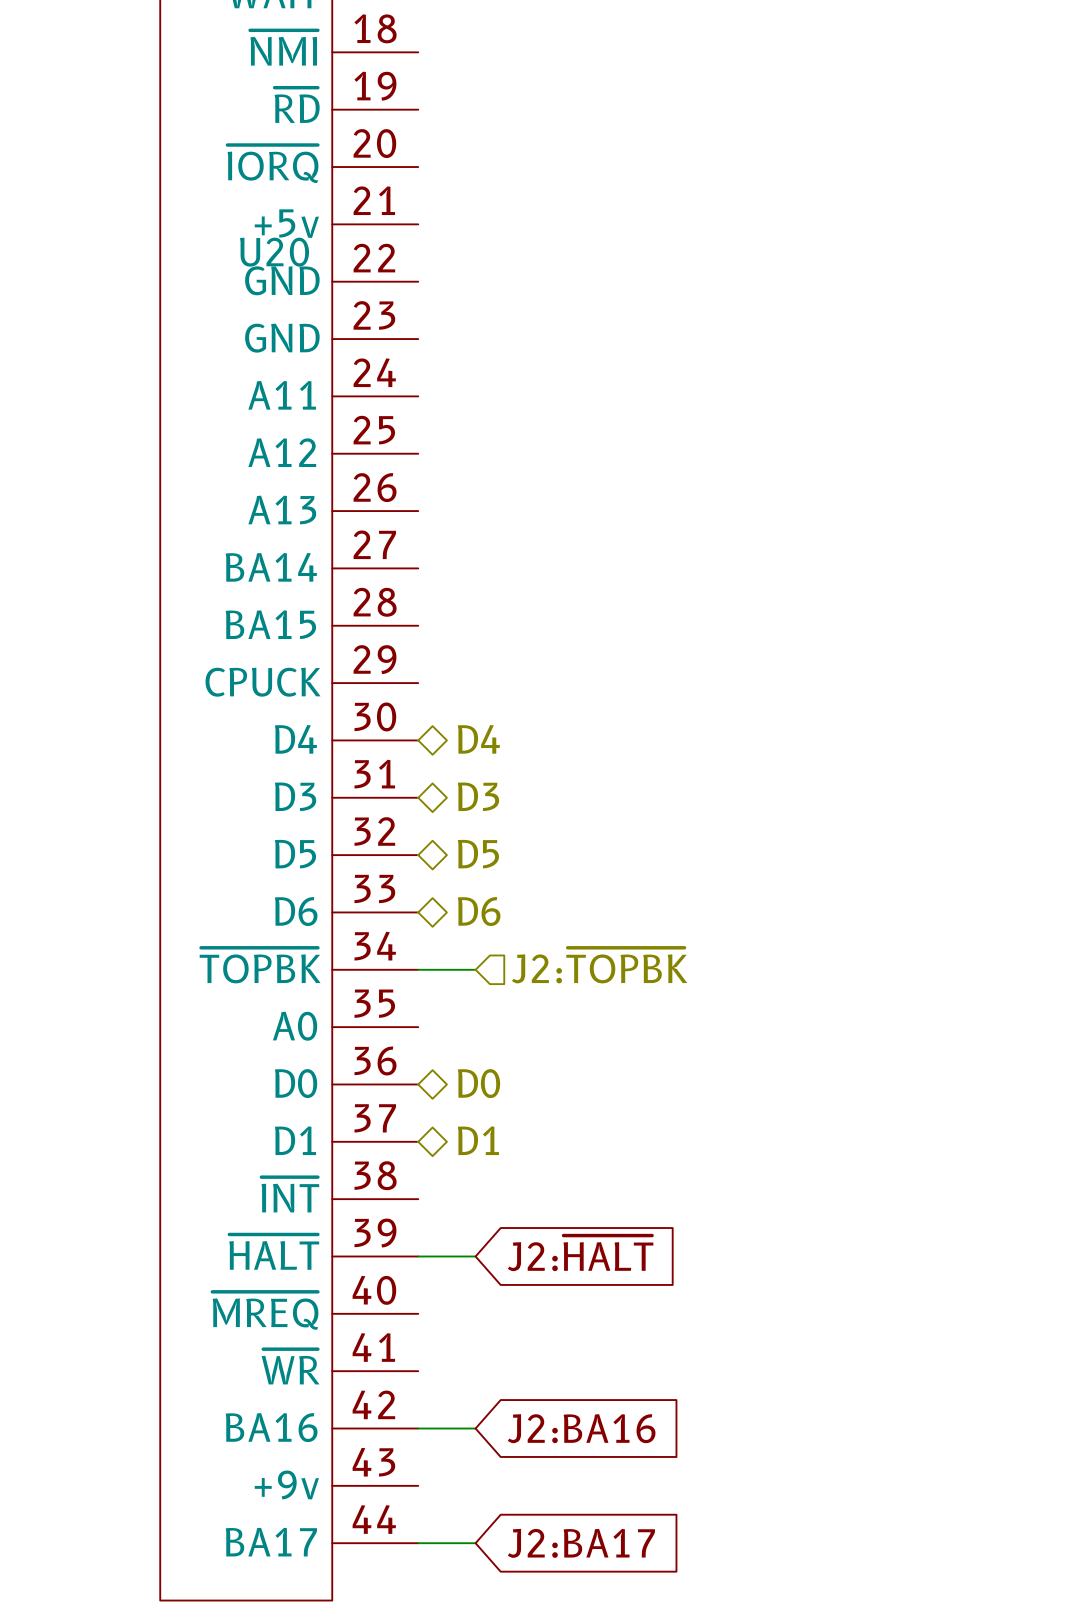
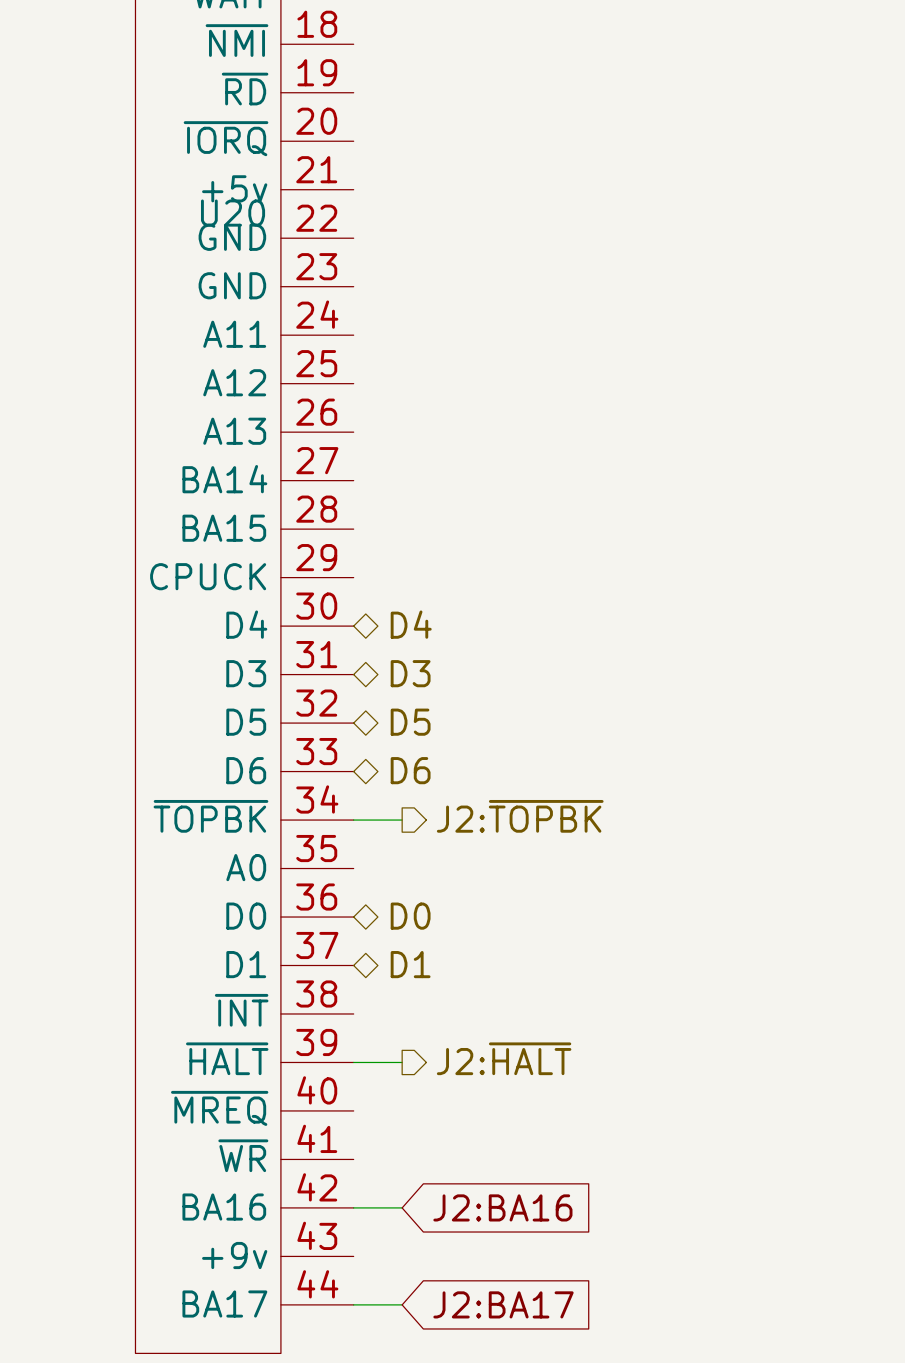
hierarchical label shape: input (599, 965) -> output (520, 816)
hierarchical label: none -> J2:~{HALT} (504, 1058)
global label: J2:~{HALT} (580, 1253) -> none

